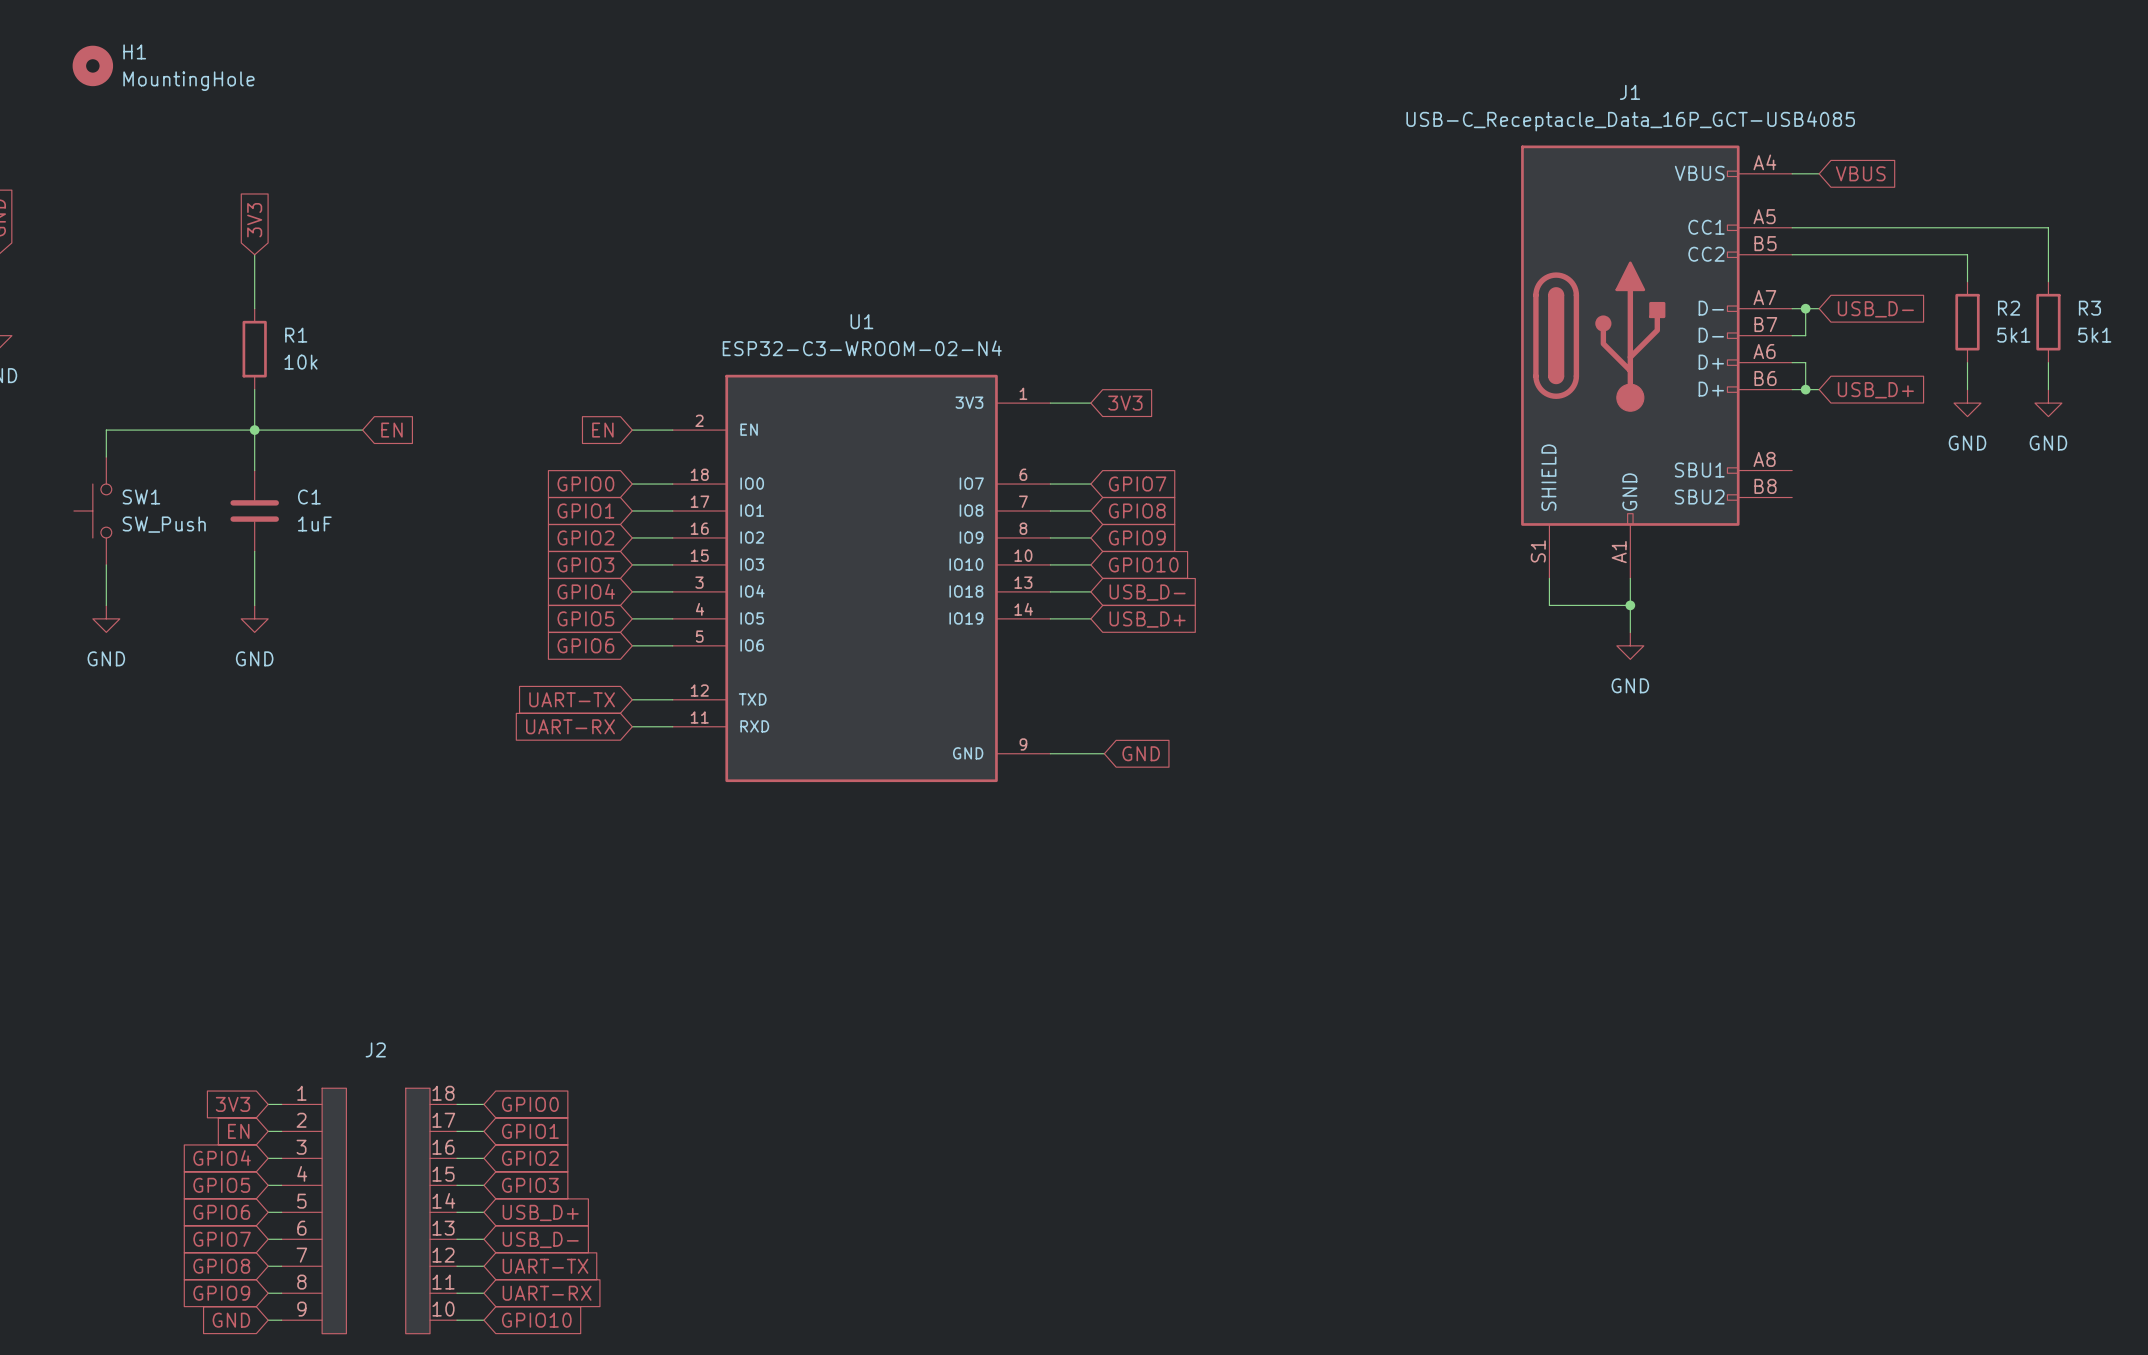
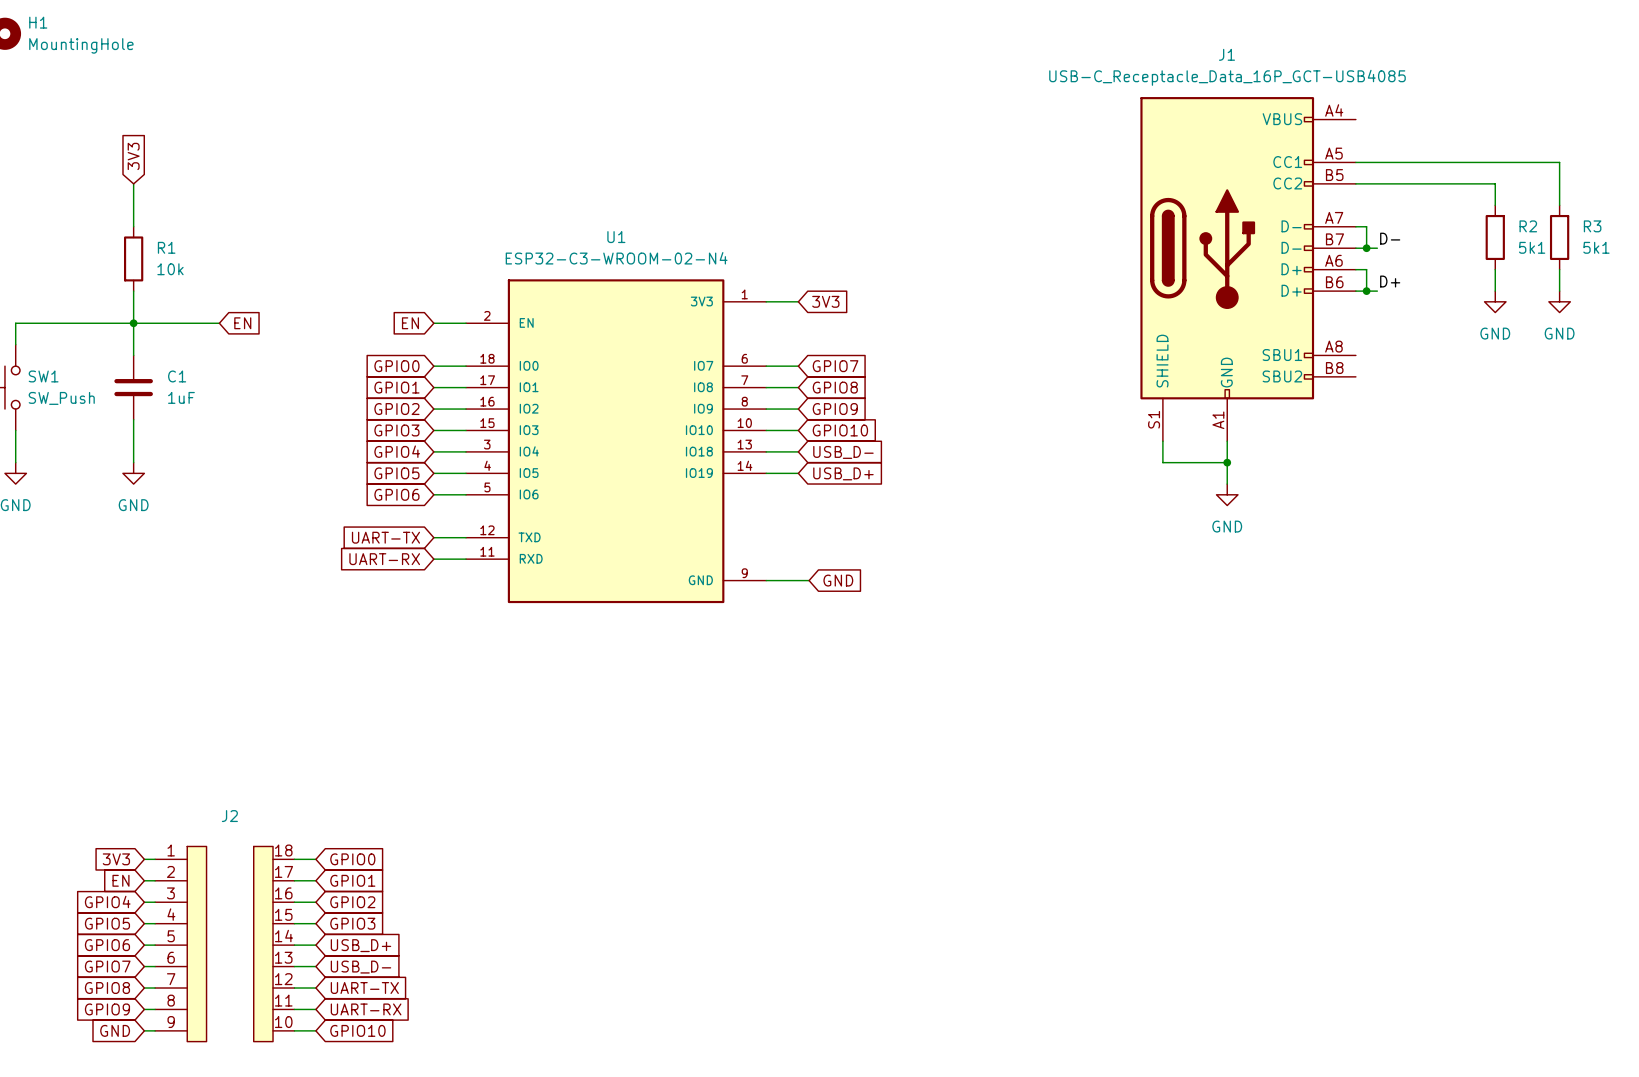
wire: (1792, 173) (1819, 173) -> none
global label: VBUS (1860, 173) -> none
wire: (1805, 308) (1819, 308) -> (1366, 248) (1377, 248)
junction position: (1805, 308) -> (1366, 248)
global label: USB_D- (1875, 309) -> none
label: none -> D- (1390, 238)
label: none -> D+ (1390, 281)
global label: USB_D+ (1875, 390) -> none

